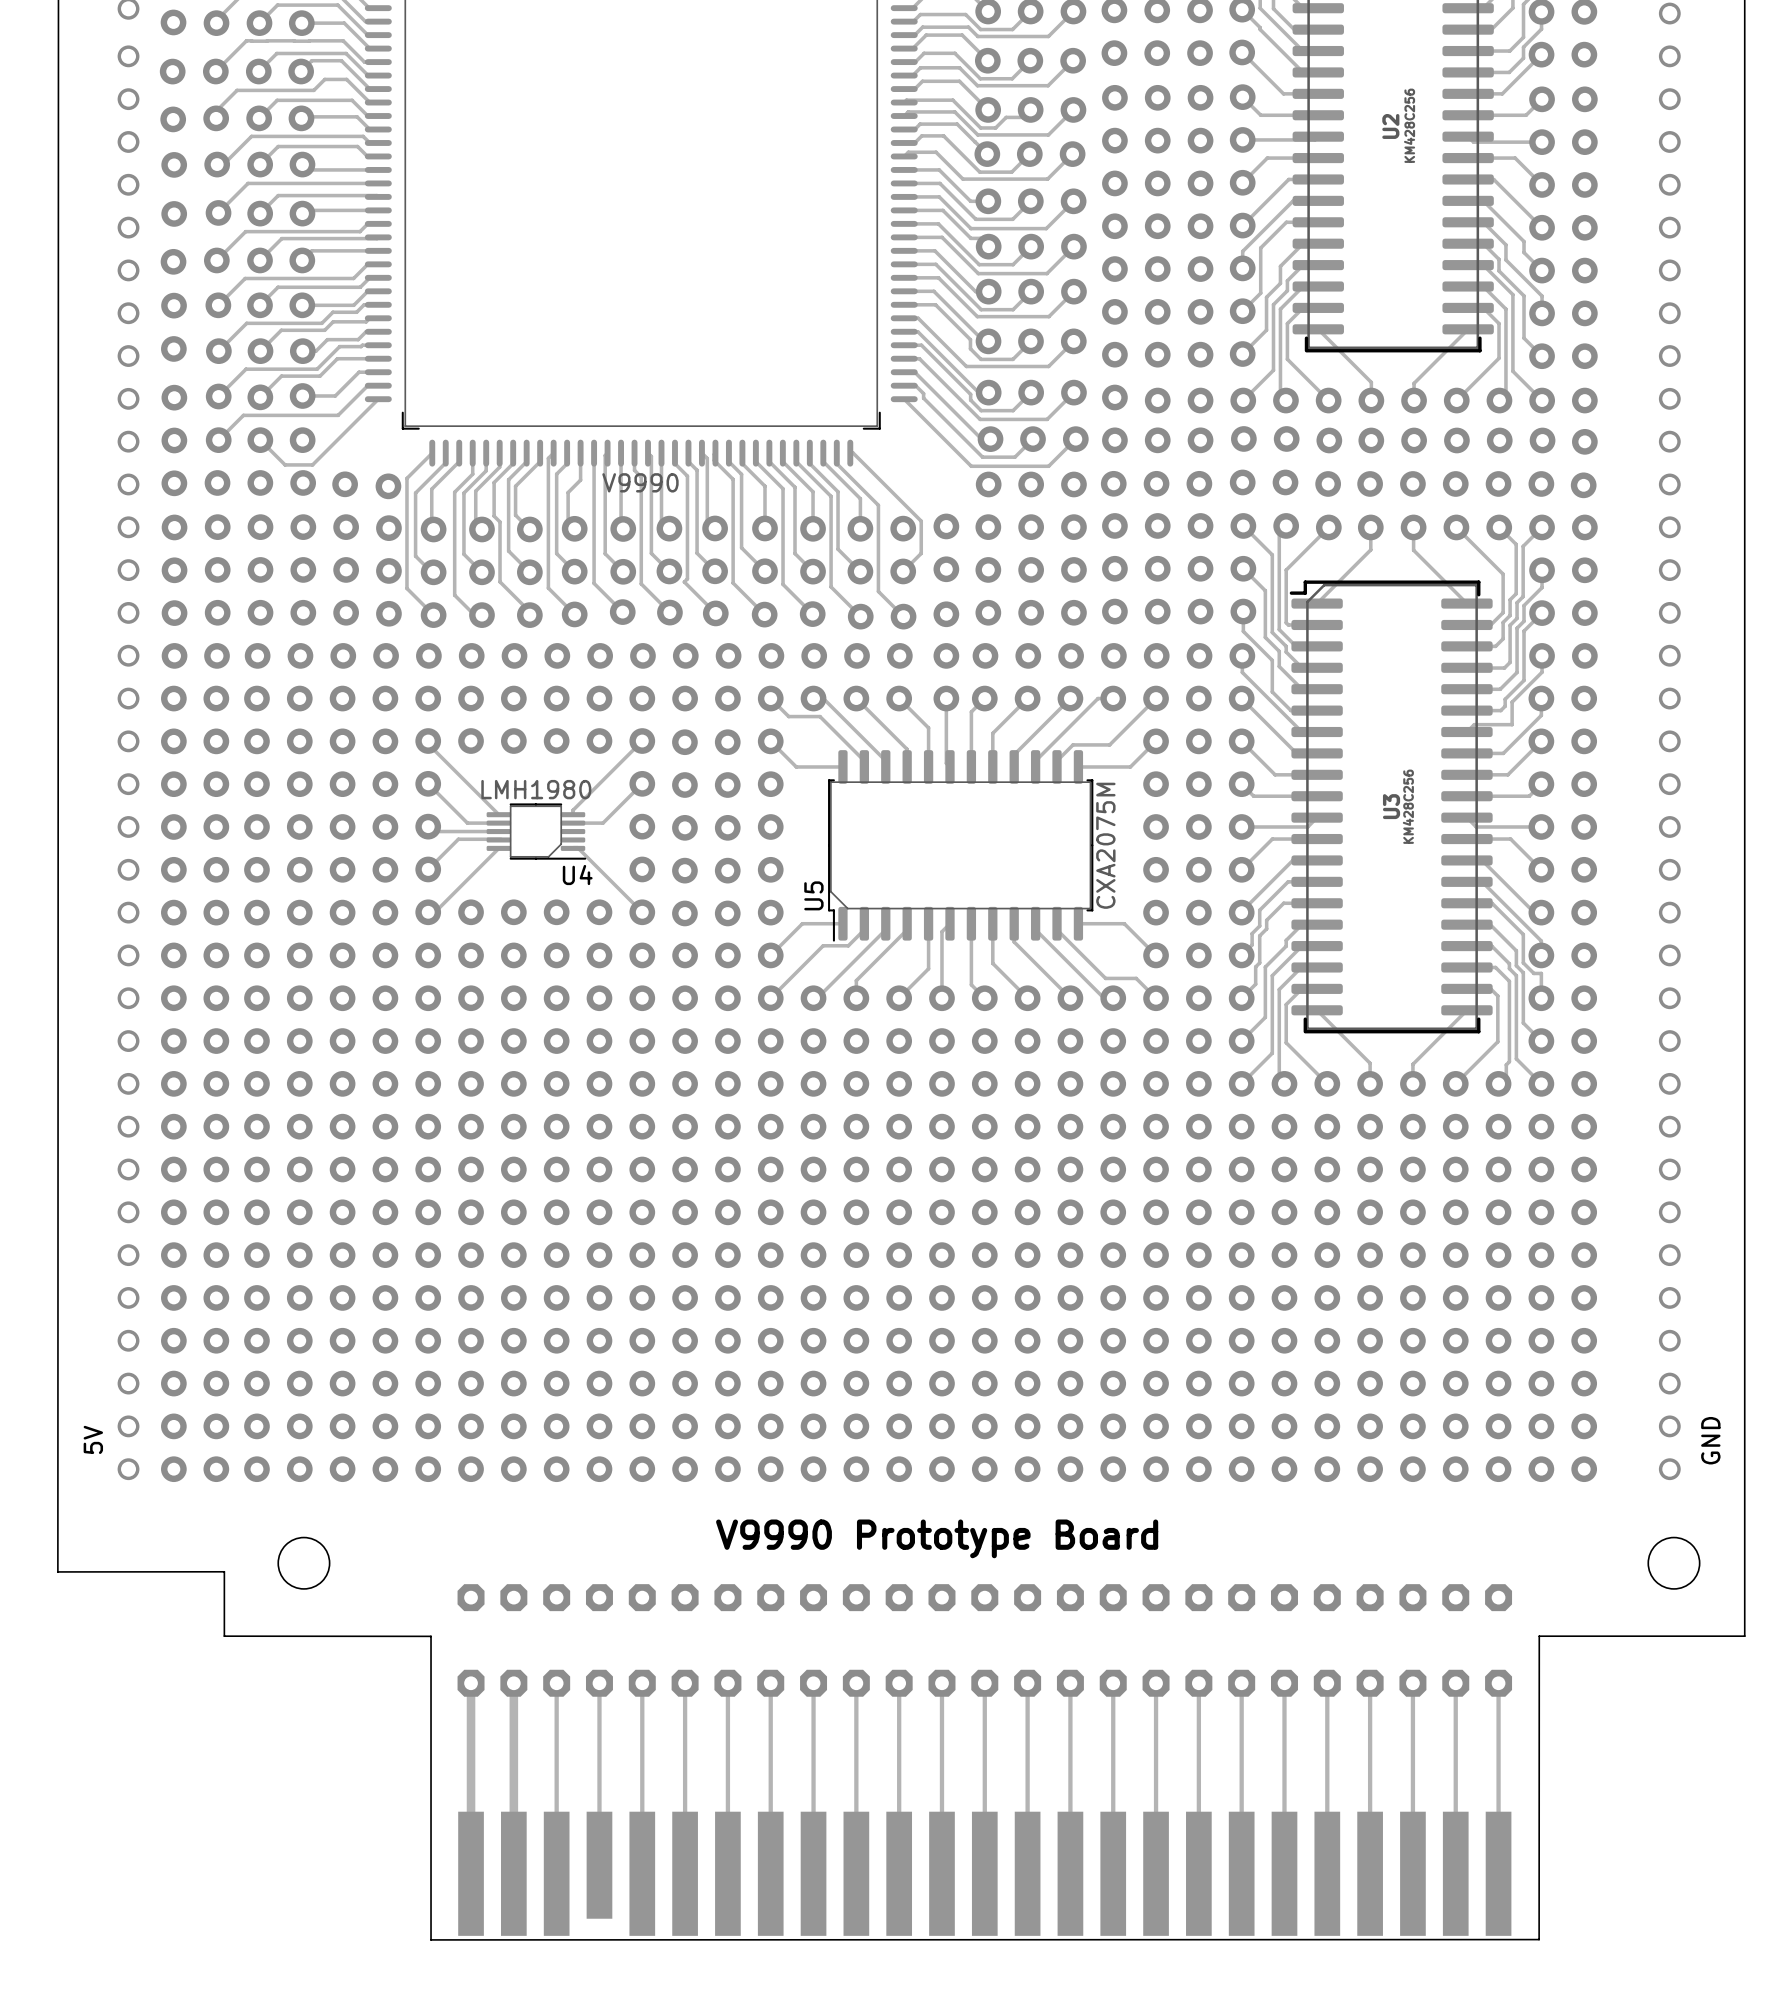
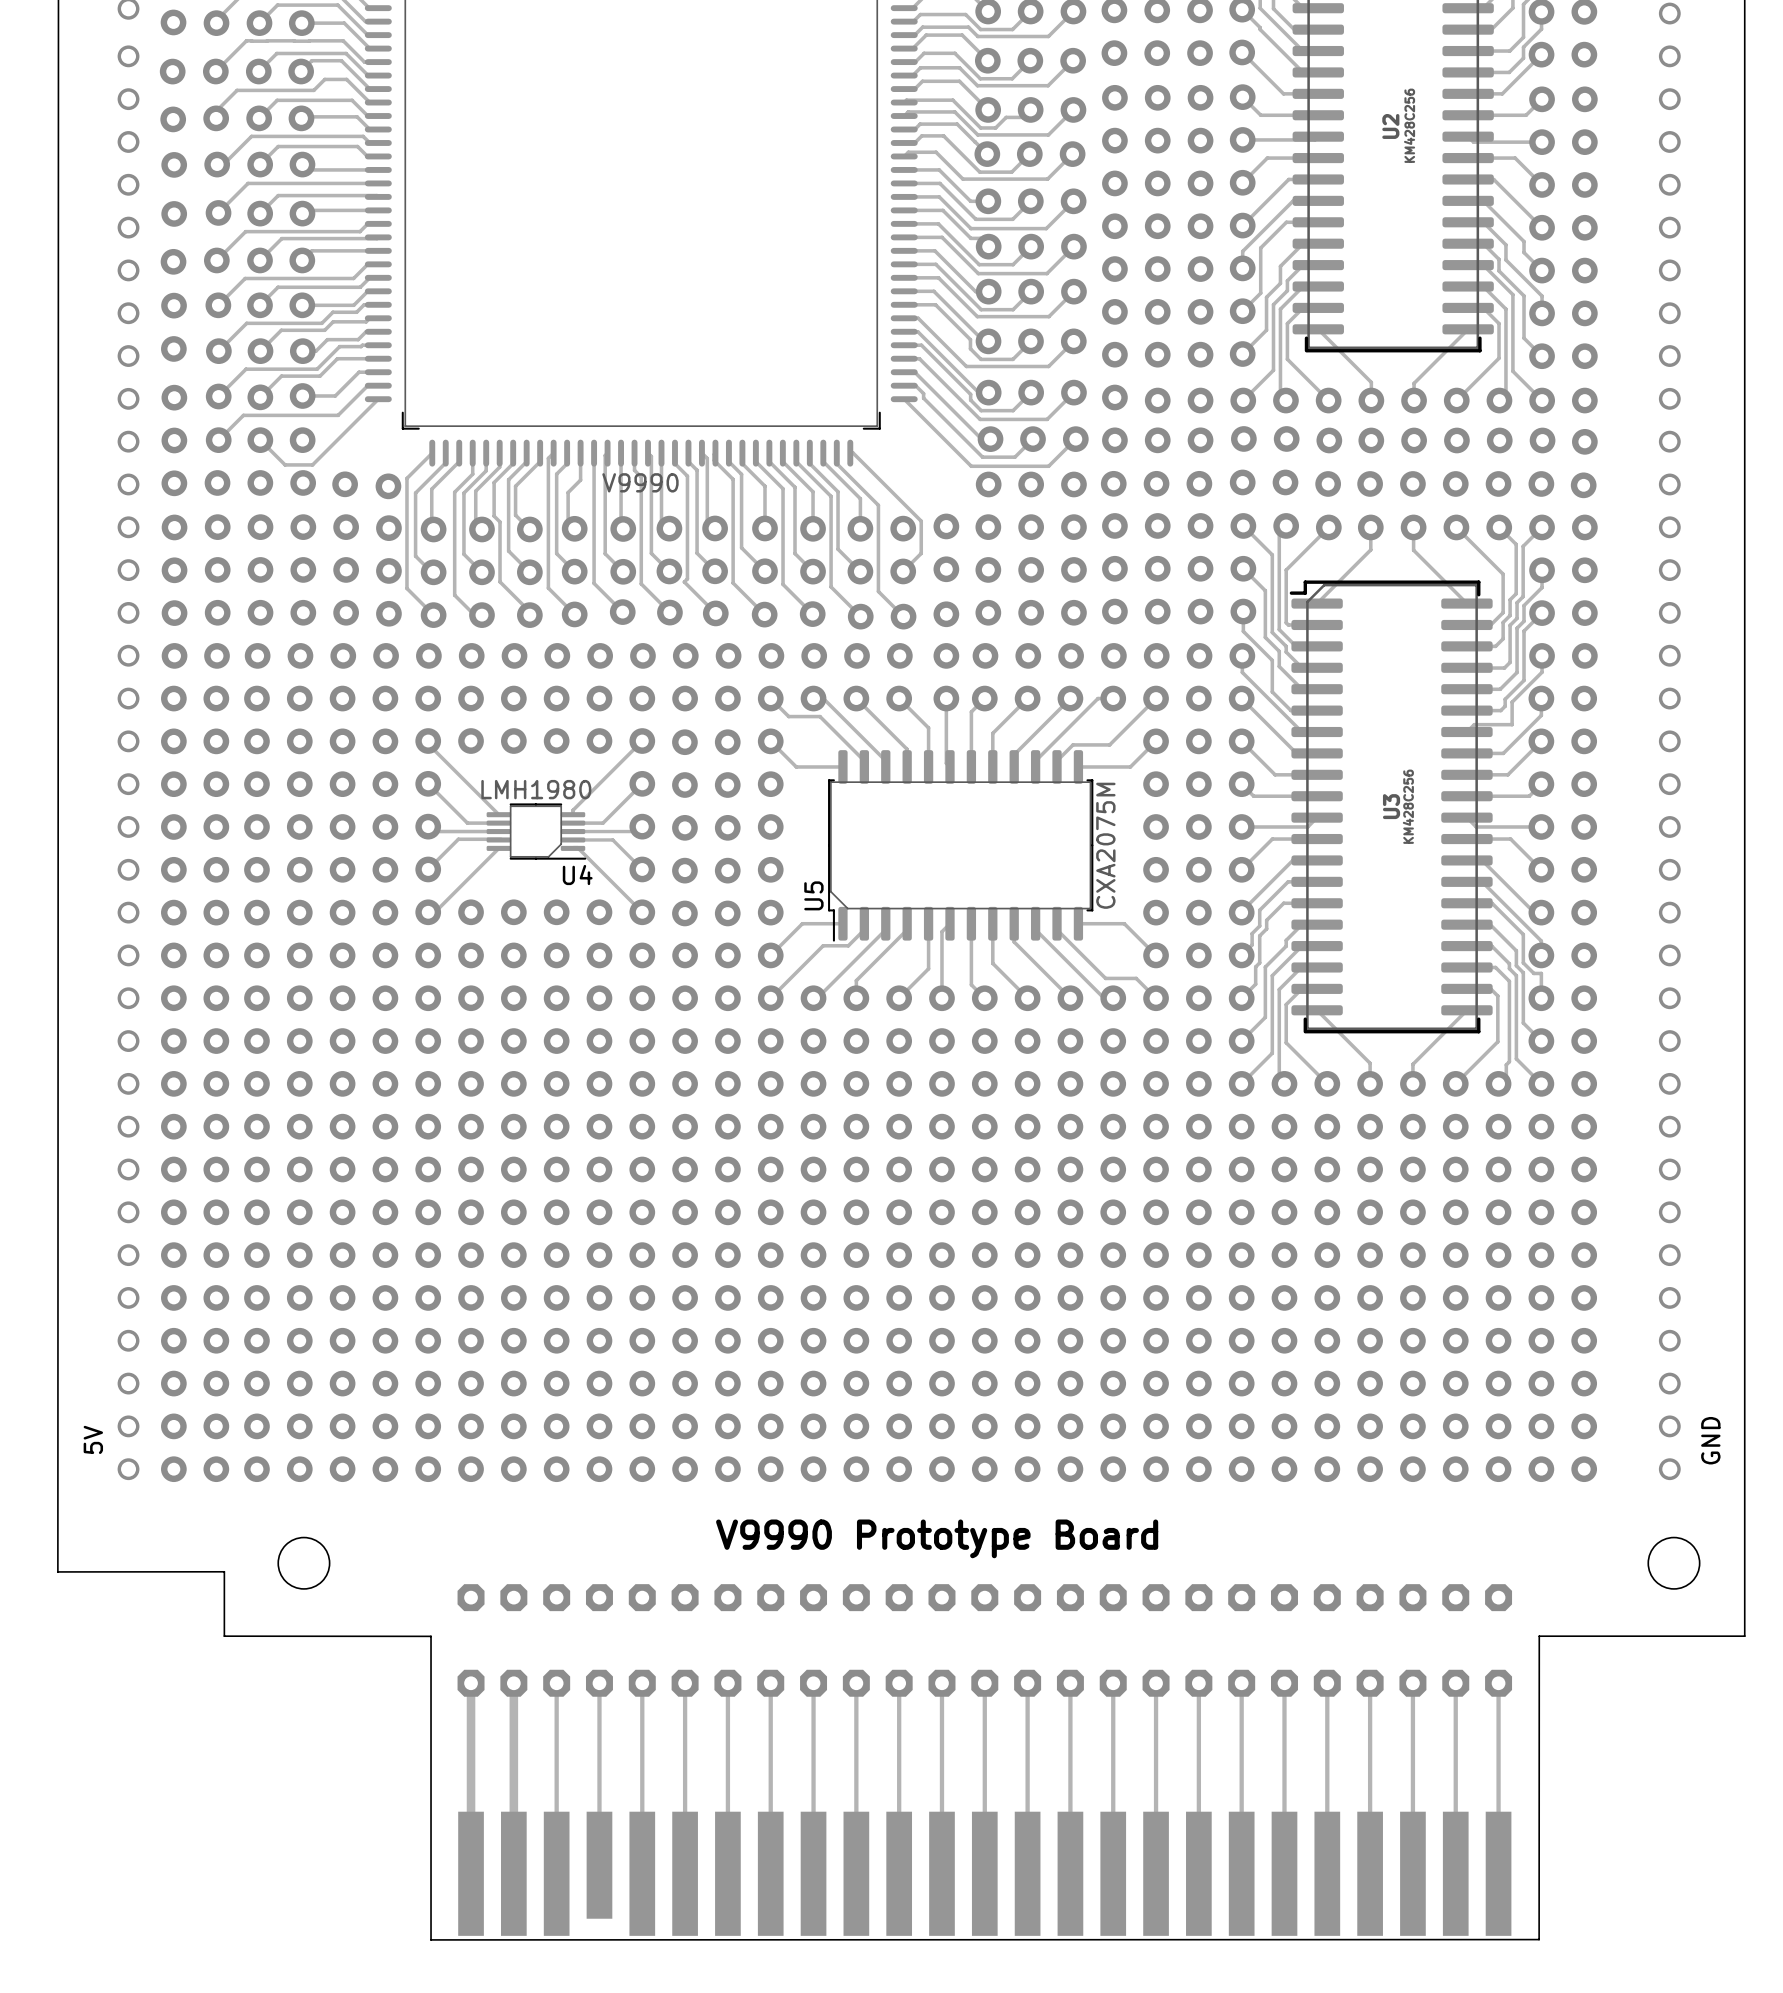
track: none -> (642, 826) (637, 831) (573, 831)
track: none -> (573, 839) (612, 839) (642, 869)

